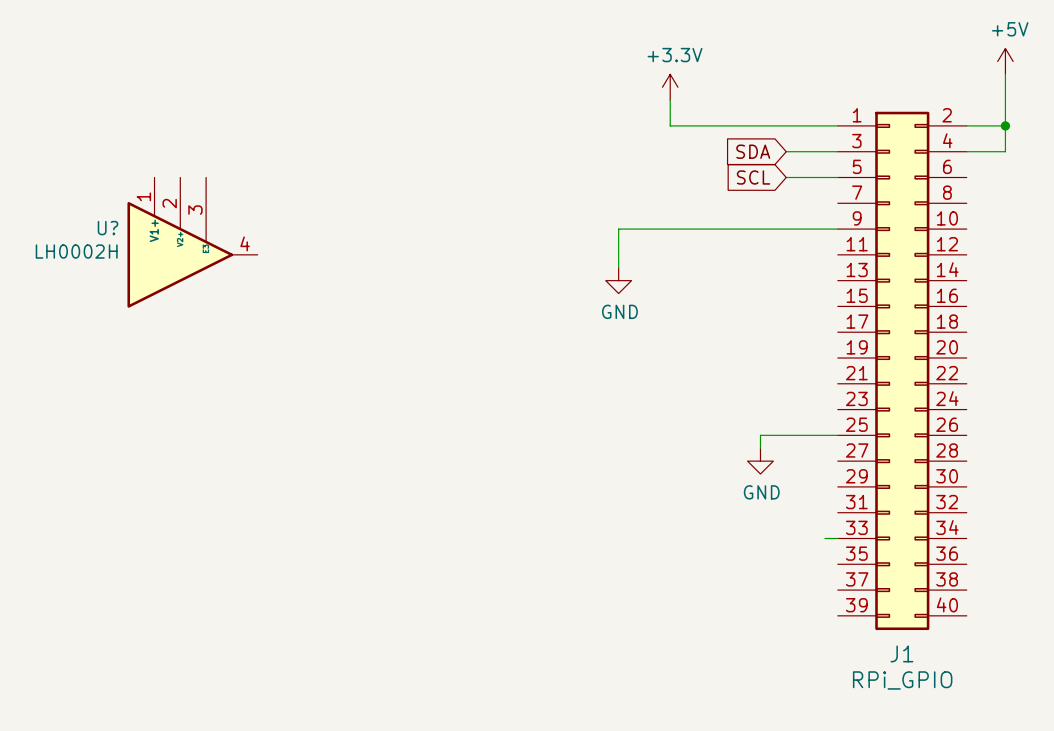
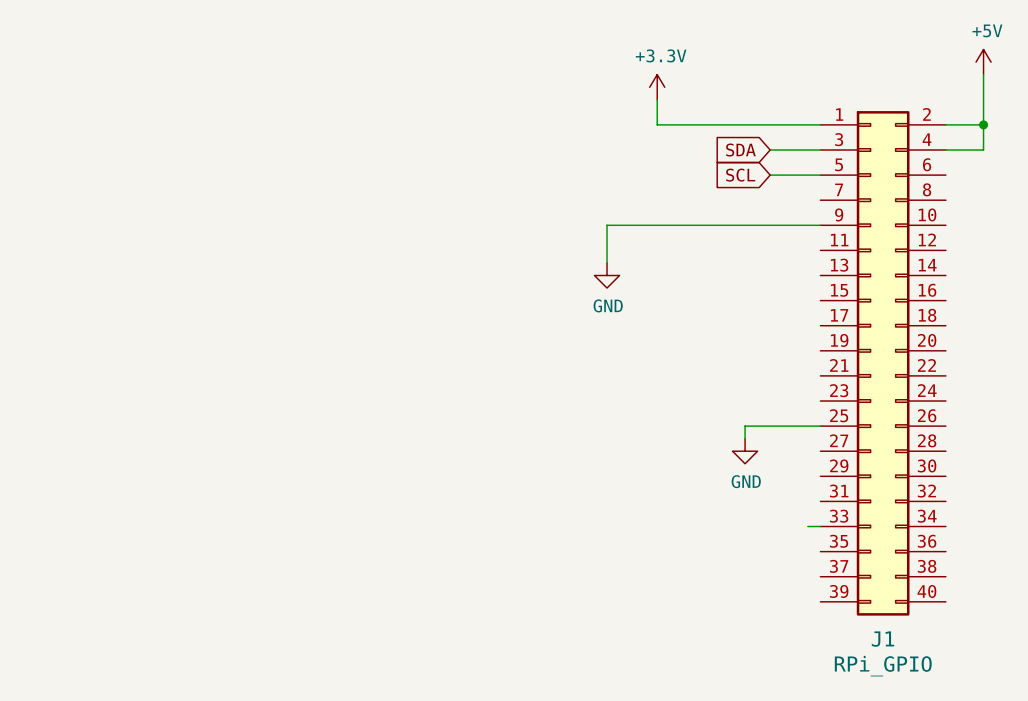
U?: LH0002H (192, 242) -> none

